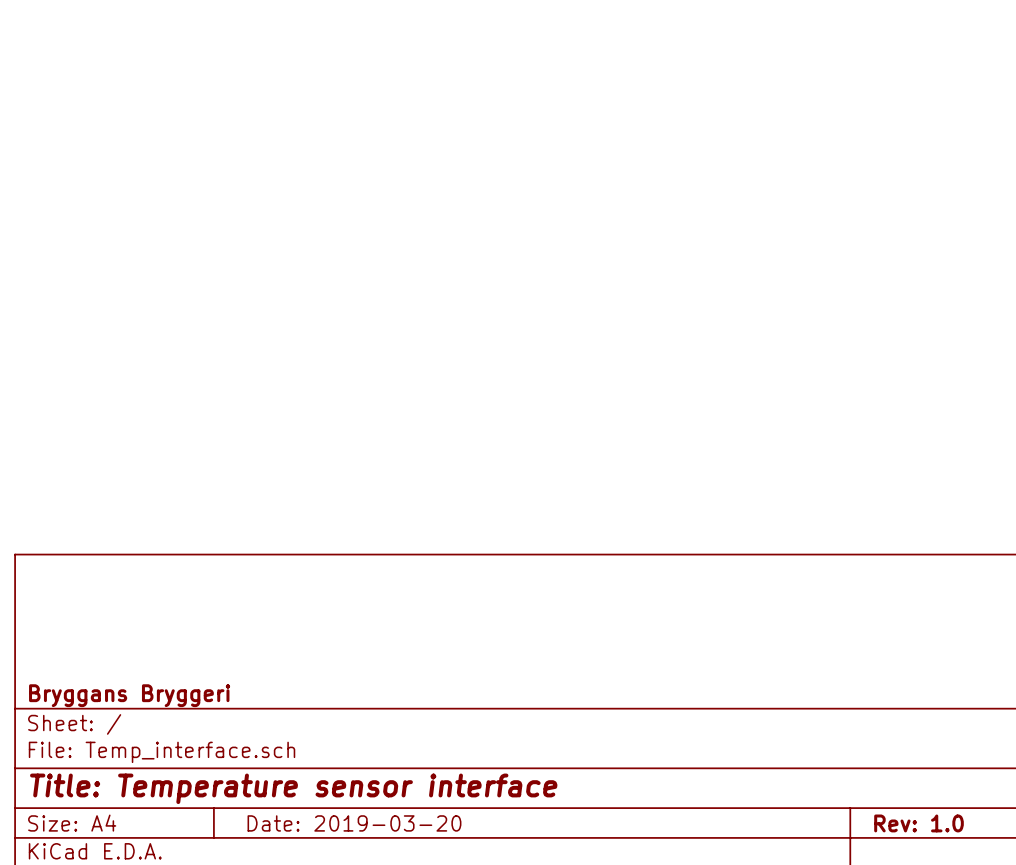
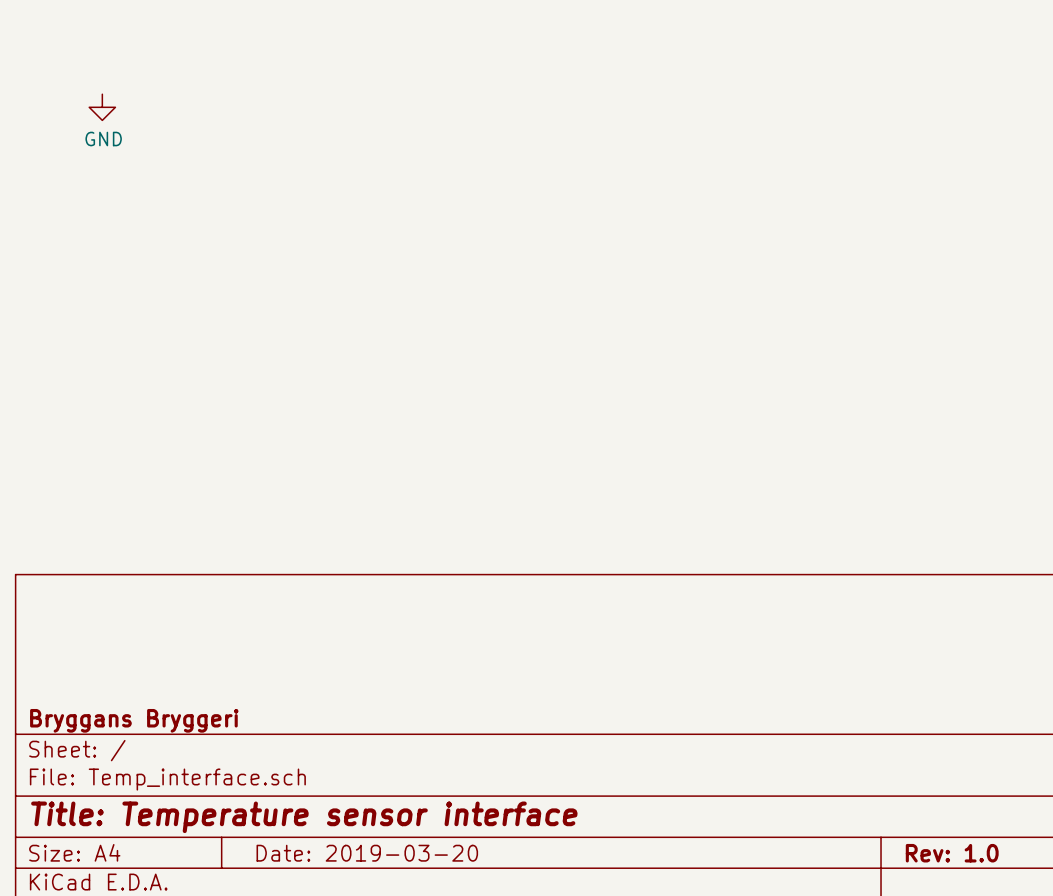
power symbol: none -> GND (102, 107)

